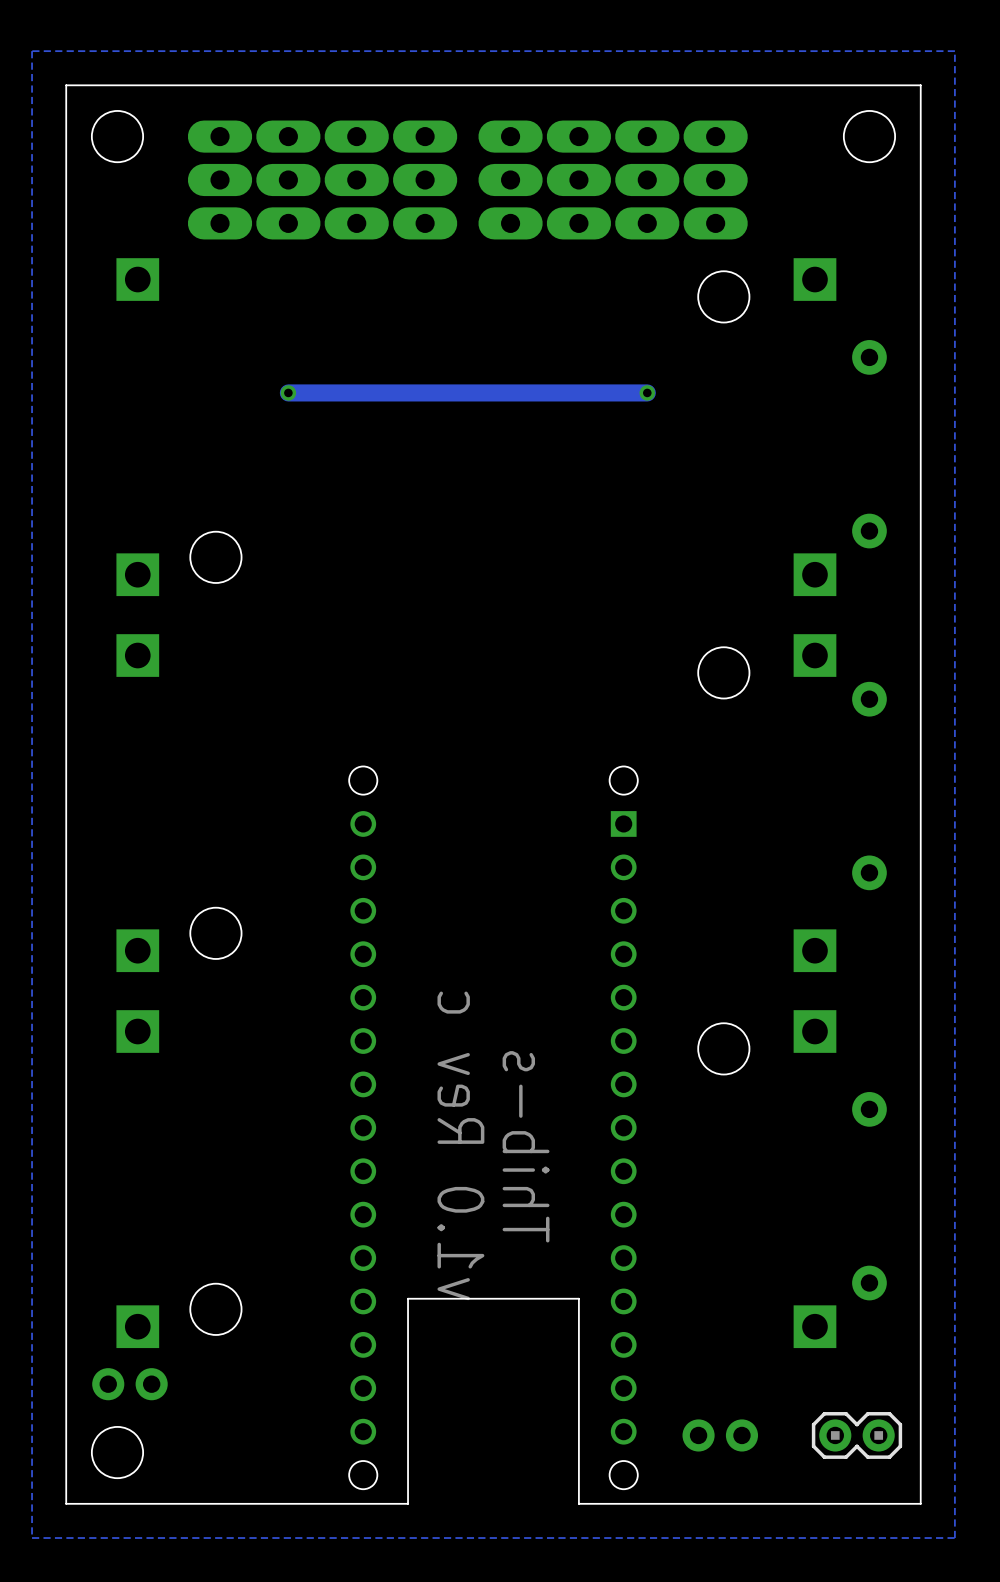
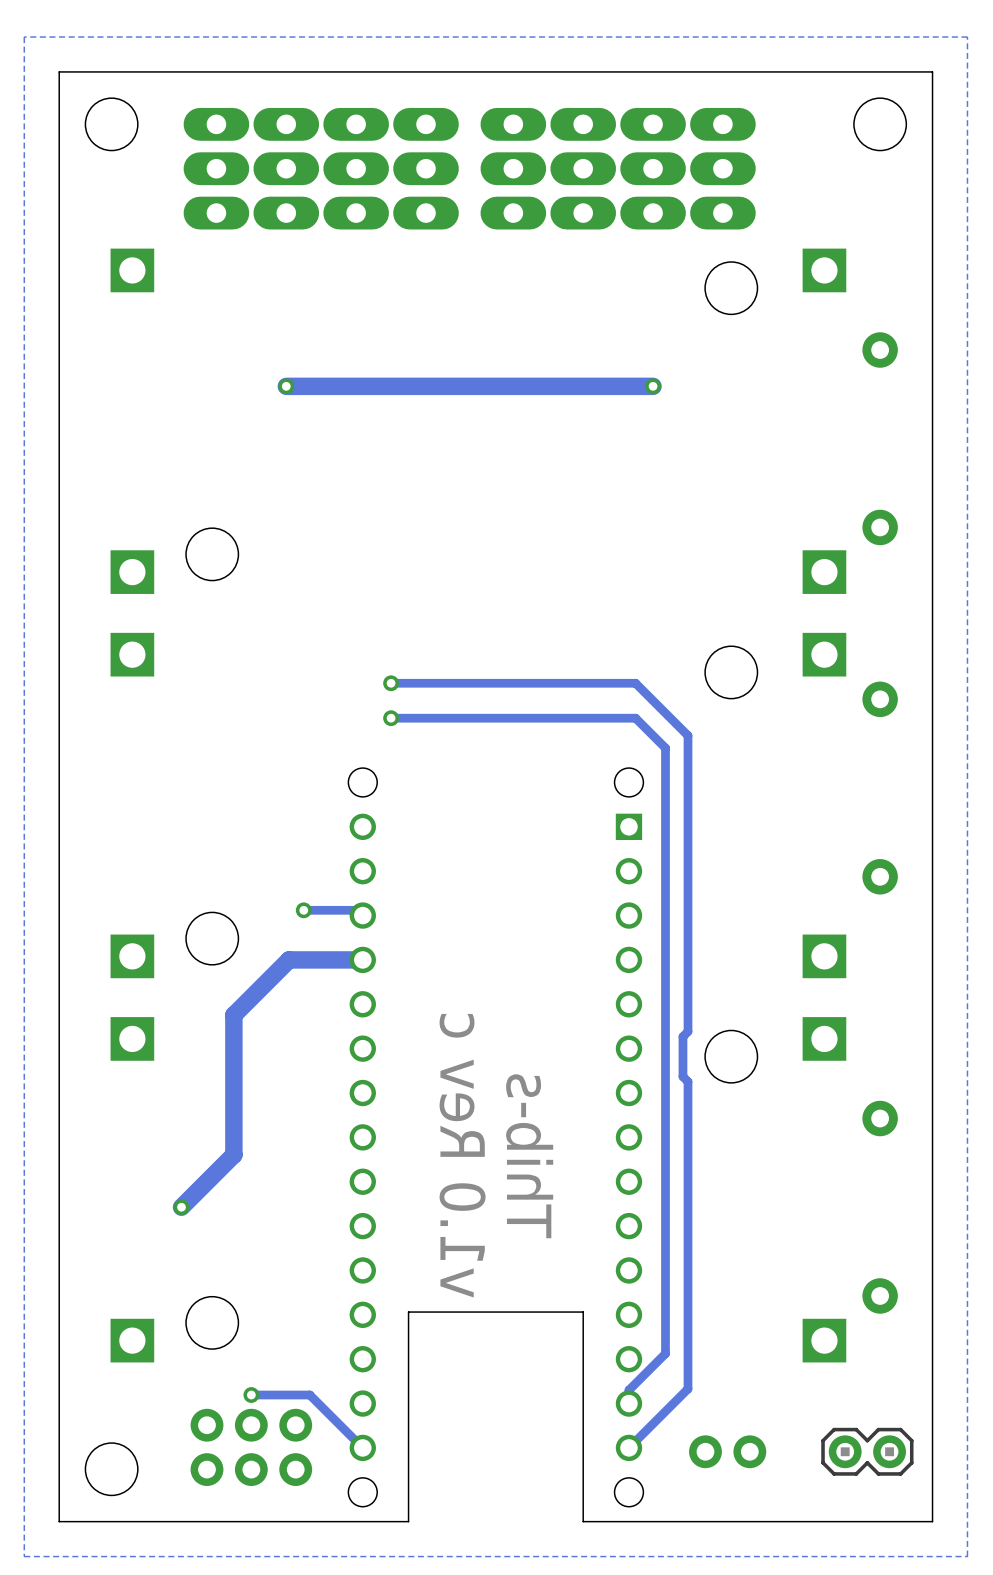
track: none -> (391, 683) (635, 683) (688, 735) (688, 1031) (682, 1036) (682, 1076) (688, 1081) (688, 1388) (628, 1447)
via: none -> (391, 683)
track: none -> (391, 718) (635, 718) (665, 748) (665, 1353) (628, 1390) (628, 1403)
via: none -> (391, 718)
track: none -> (303, 910) (357, 910) (362, 915)
via: none -> (303, 910)
track: none -> (362, 959) (289, 959) (233, 1015) (233, 1154) (181, 1207)
via: none -> (181, 1207)
track: none -> (251, 1395) (309, 1395) (362, 1447)
via: none -> (251, 1395)
part: (129, 1384) -> none
part: none -> (251, 1447)

